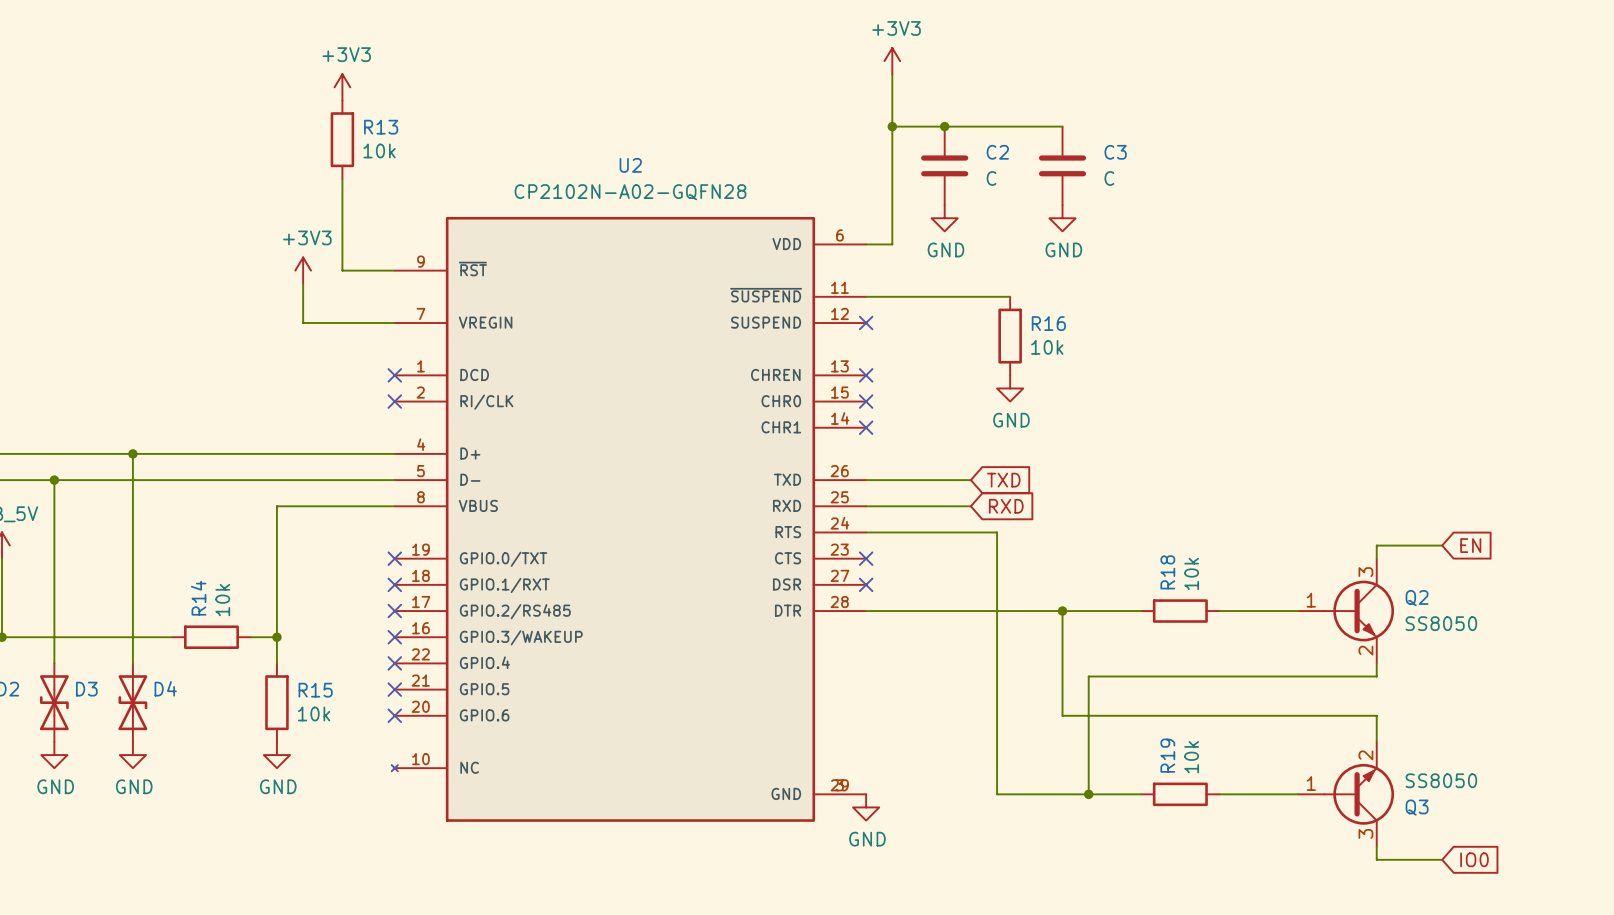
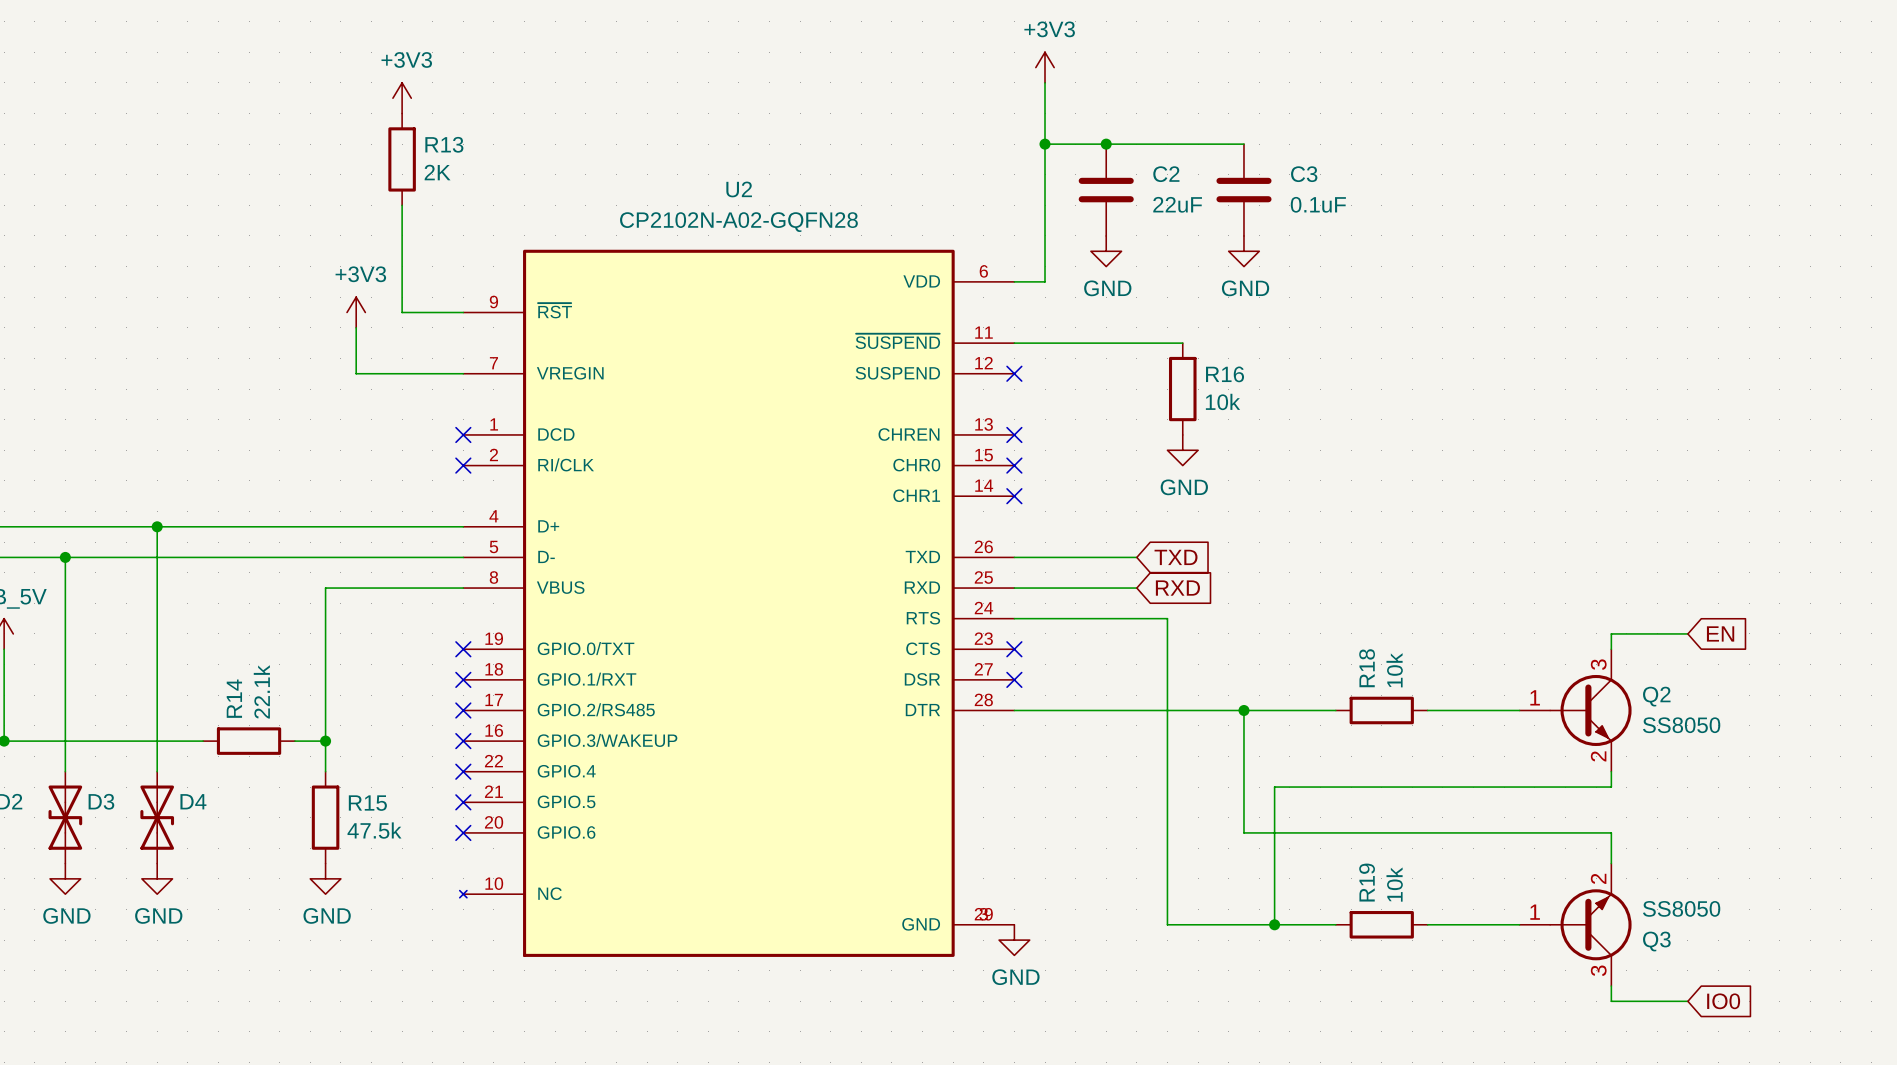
R13 value: 10k (379, 150) -> 2K (437, 172)
C2 value: C (991, 178) -> 22uF (1177, 204)
C3 value: C (1109, 178) -> 0.1uF (1318, 204)
R14 value: 10k (222, 600) -> 22.1k (261, 691)
R15 value: 10k (314, 713) -> 47.5k (374, 830)

